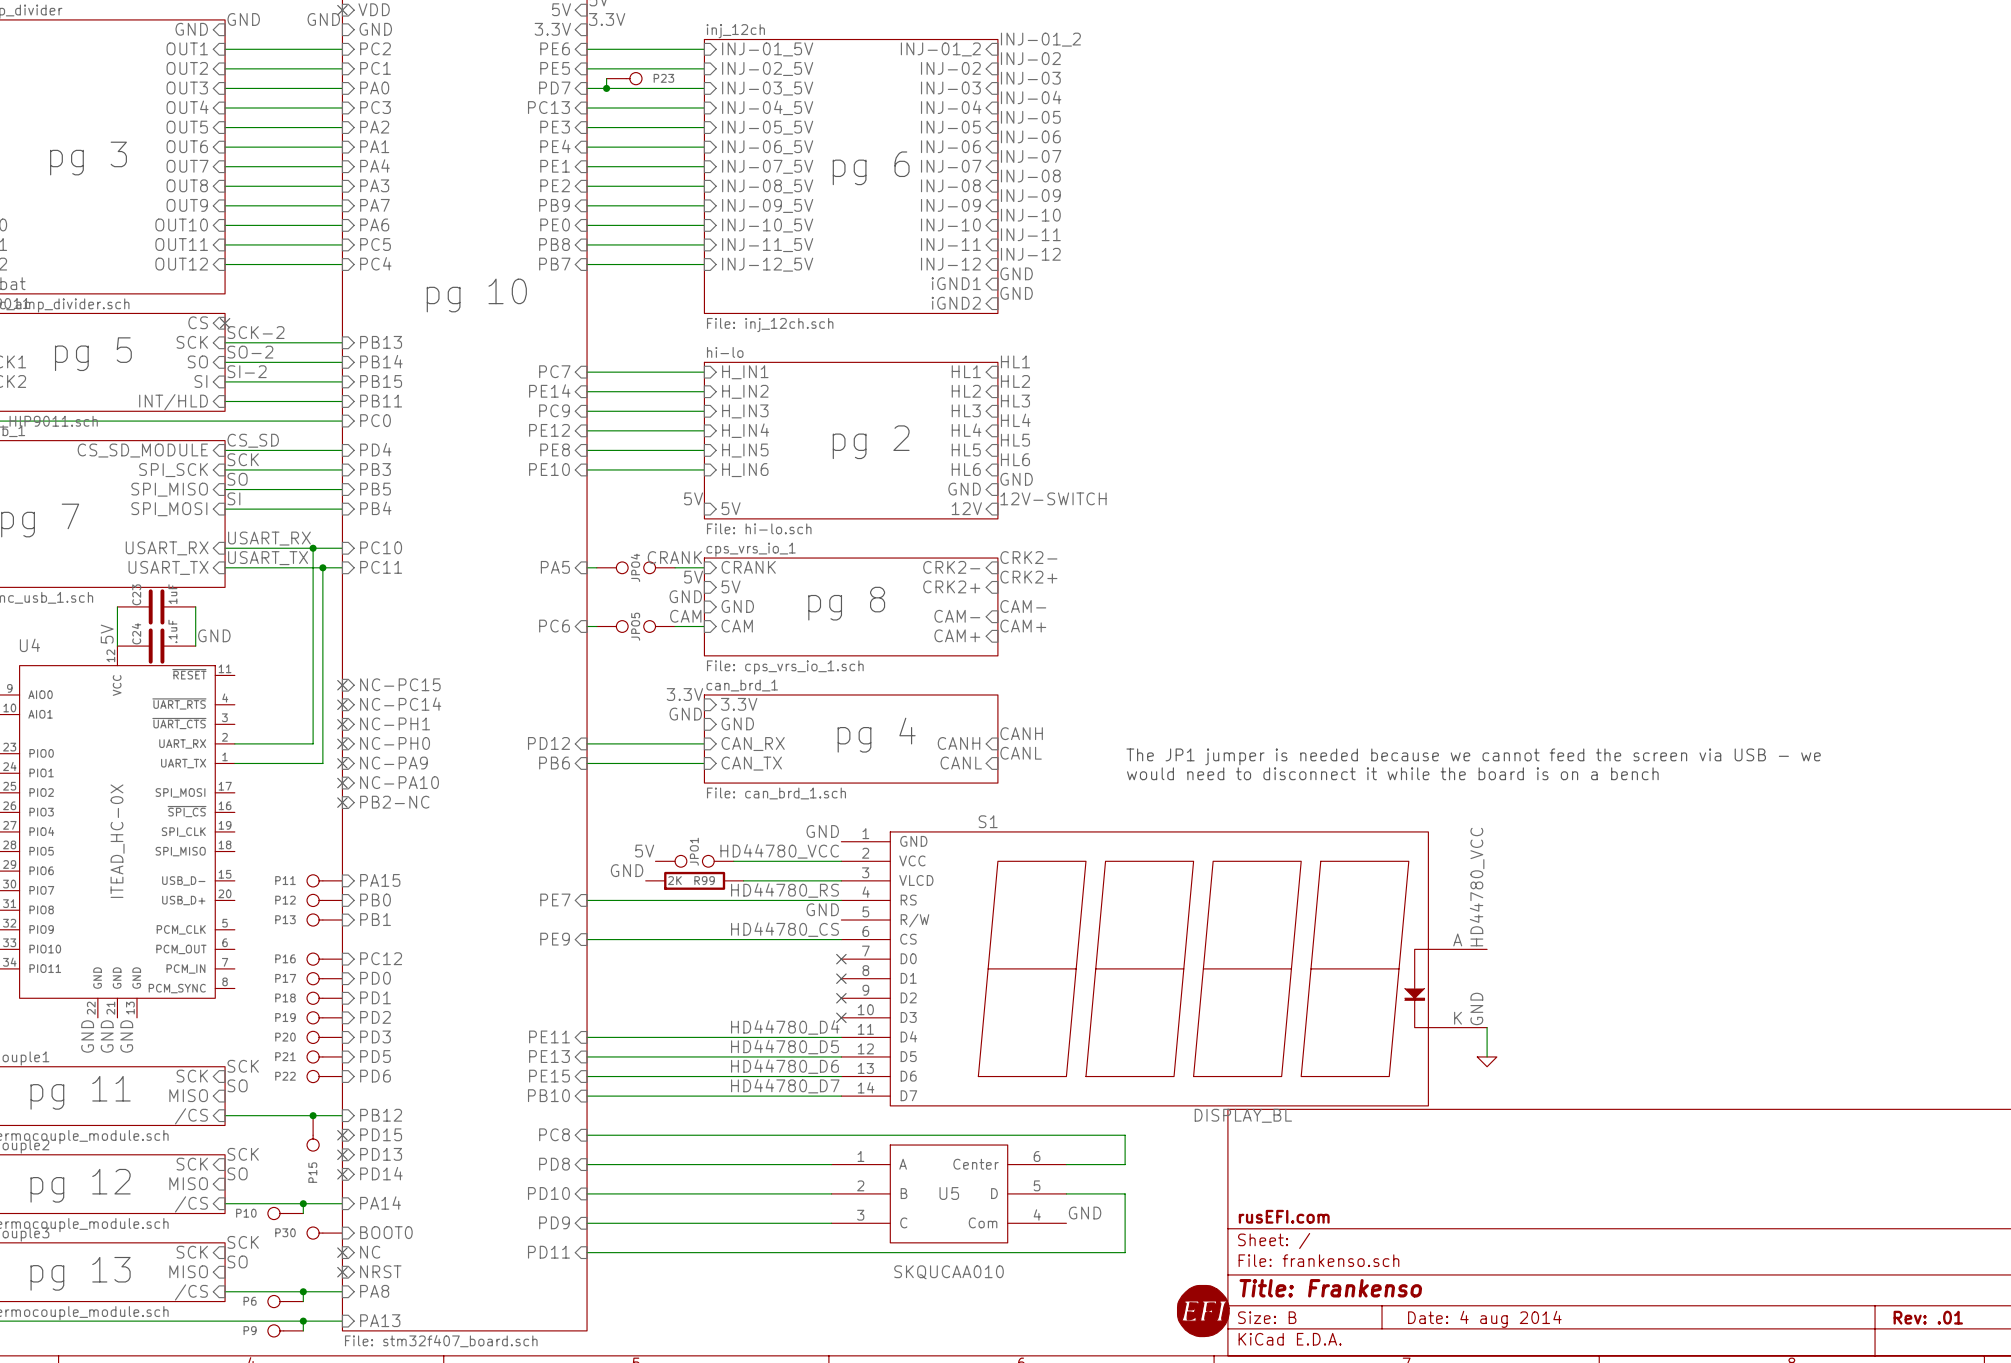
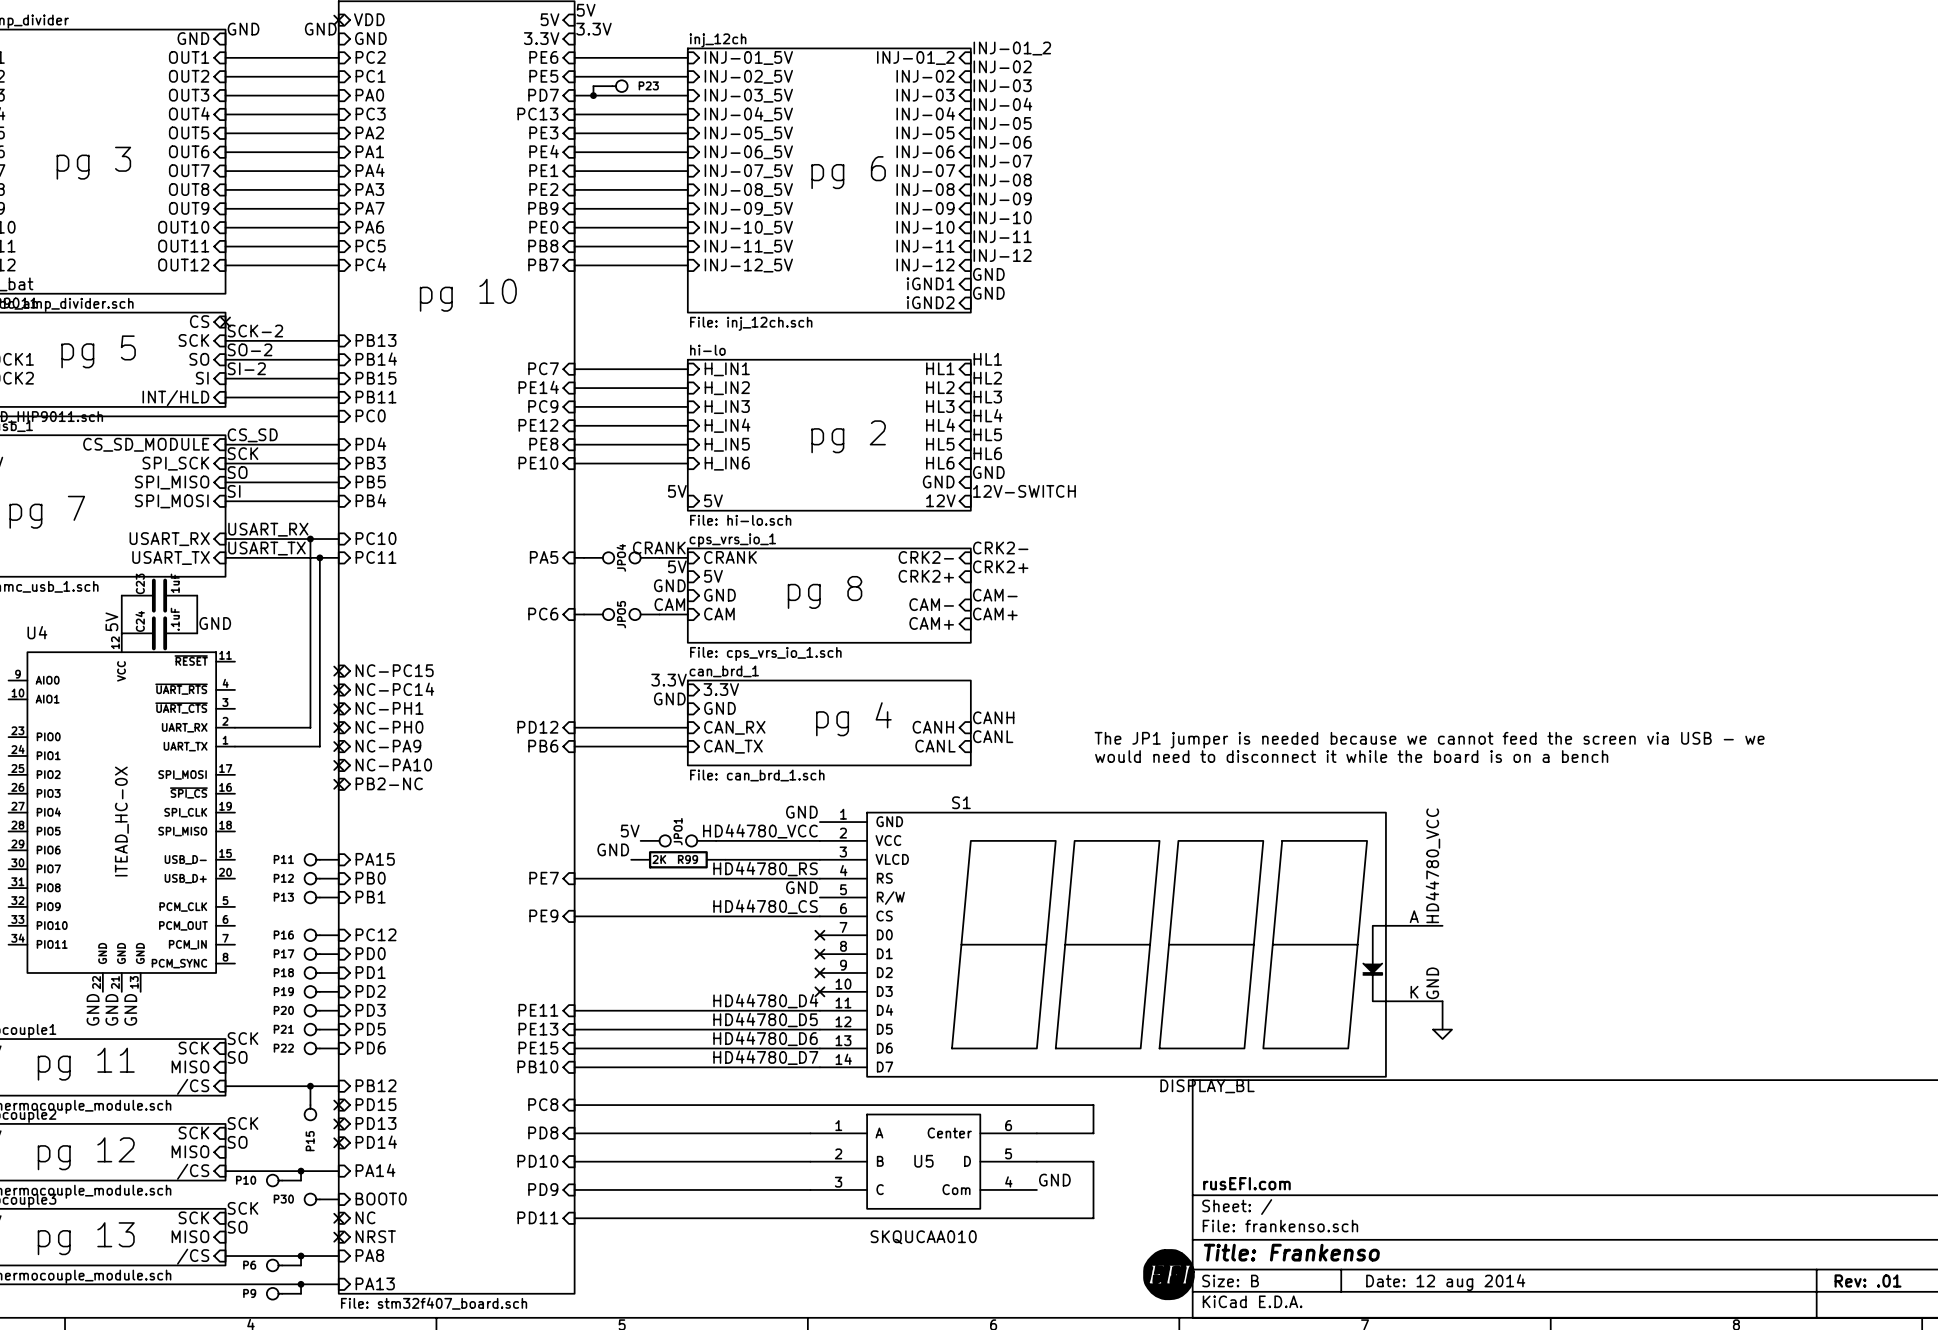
title block: Date: 4 aug 2014 (1484, 1319) -> Date: 12 aug 2014 (1445, 1282)

